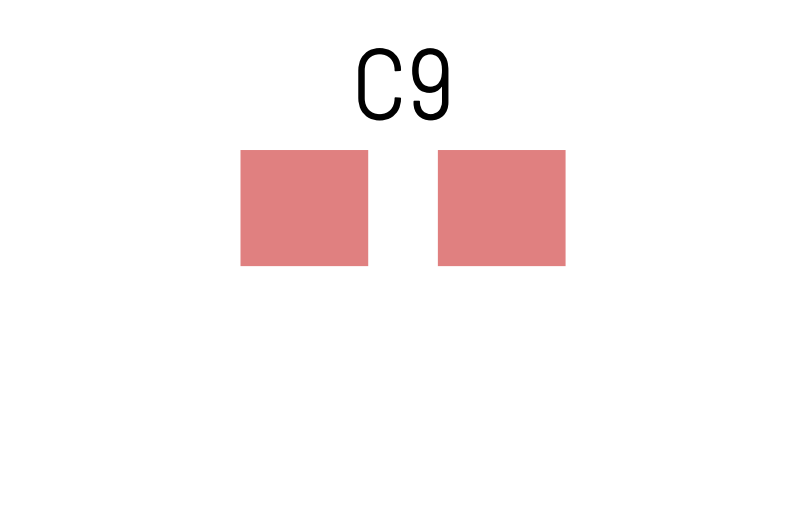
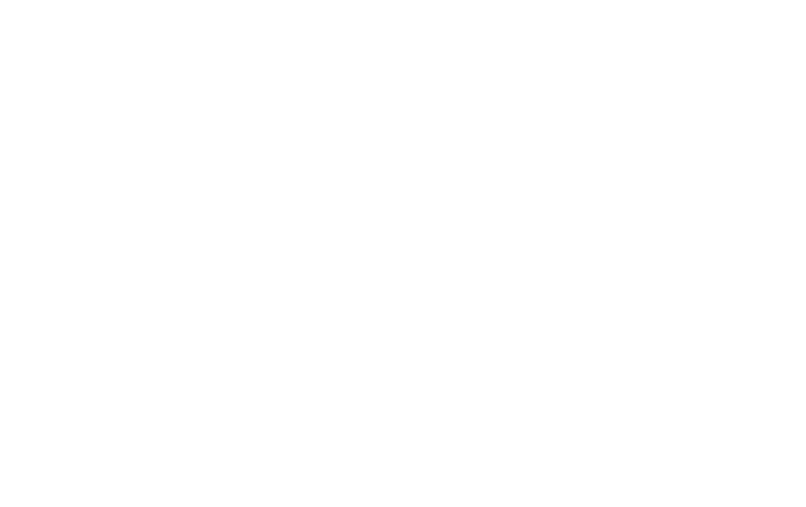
C9: (403, 208) -> none

